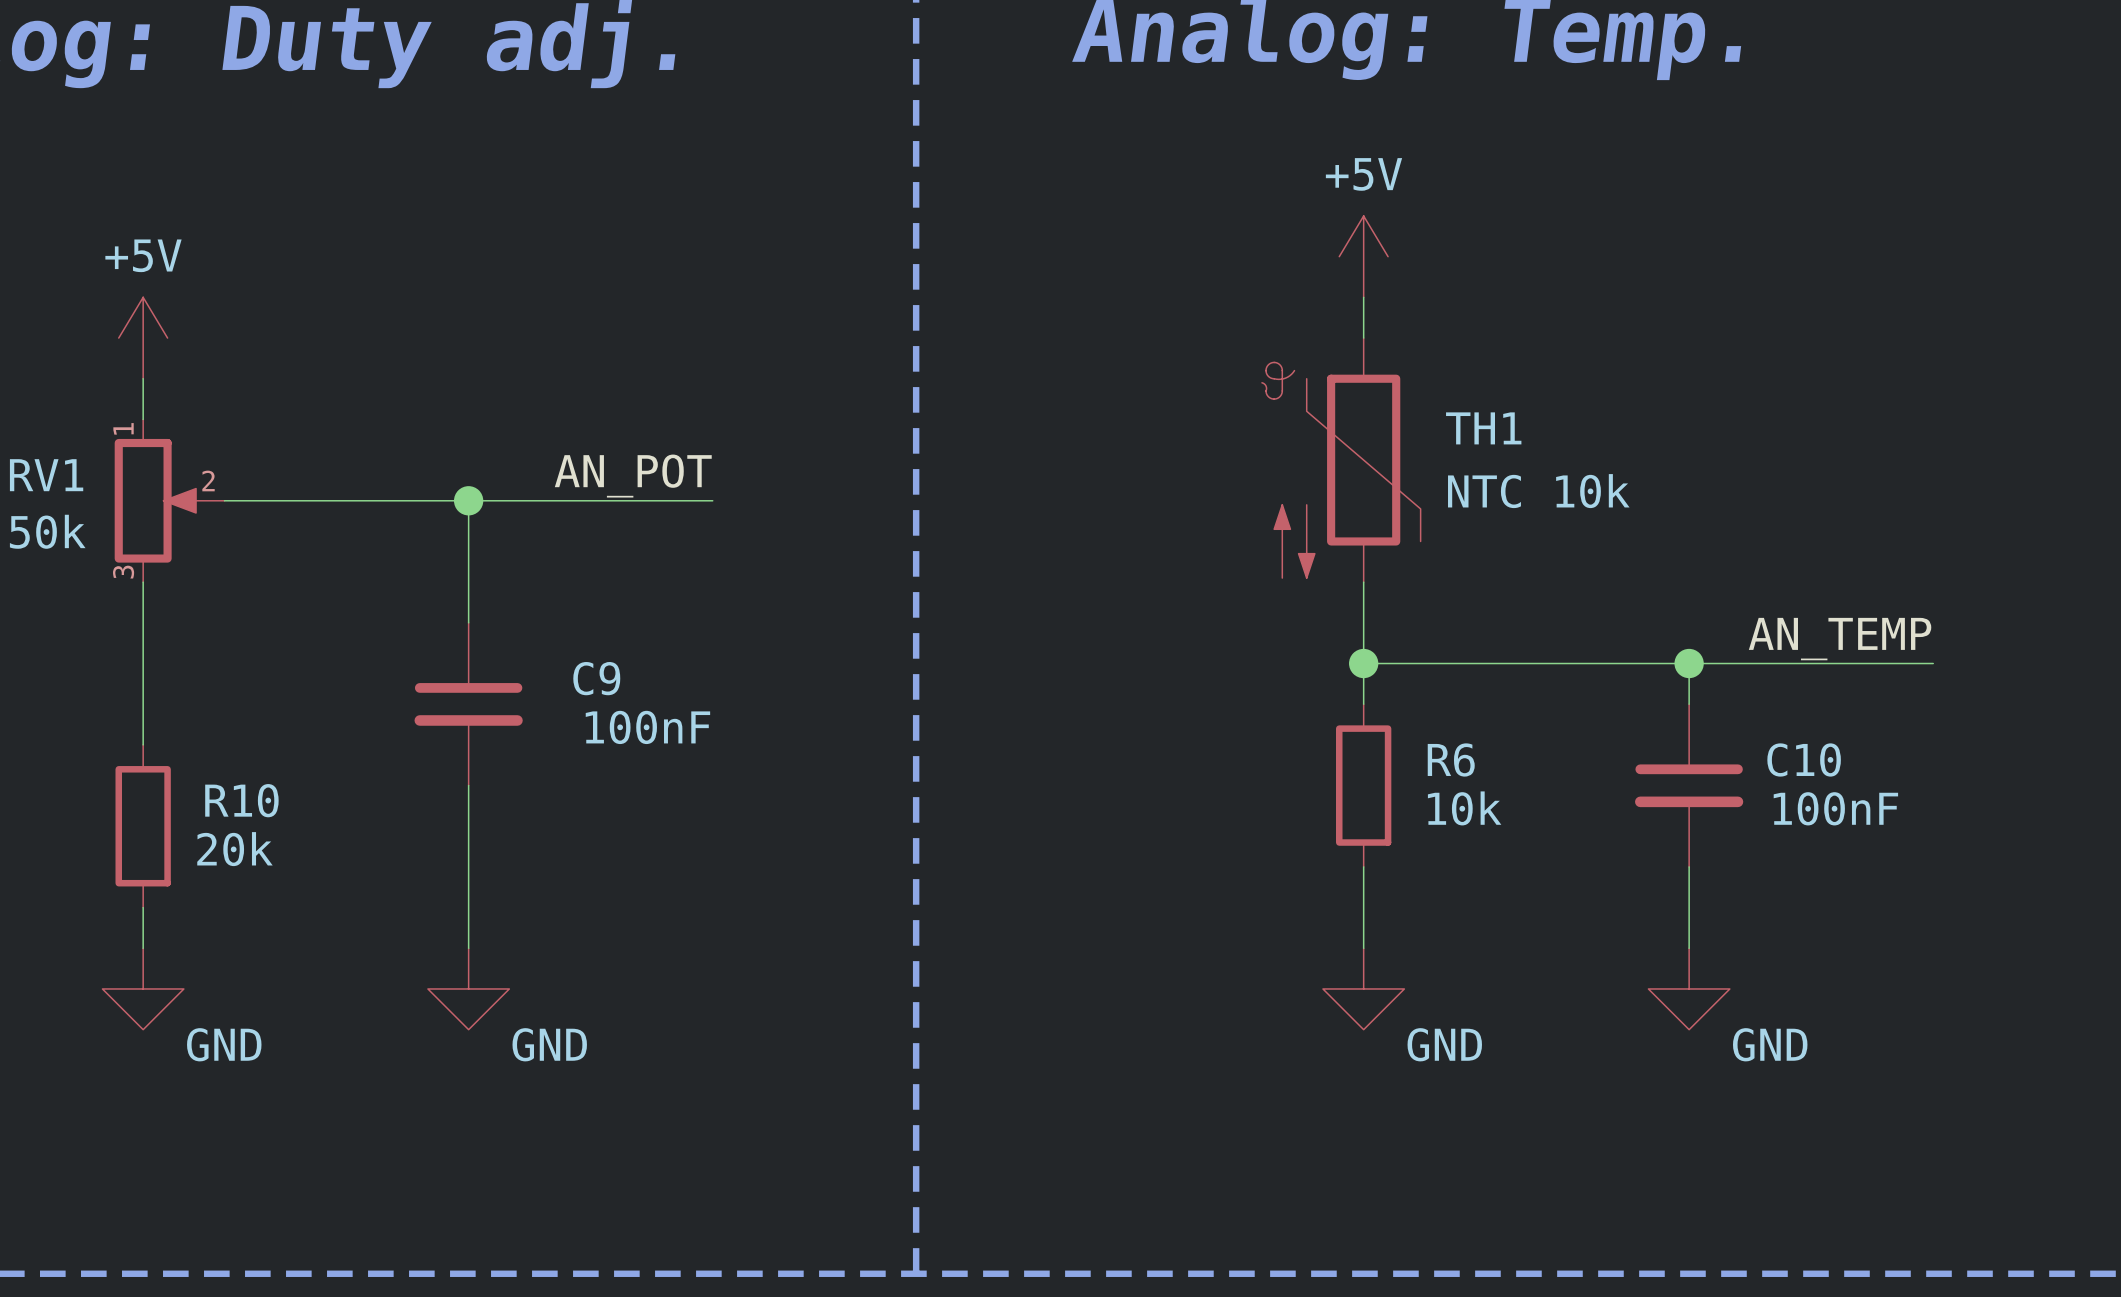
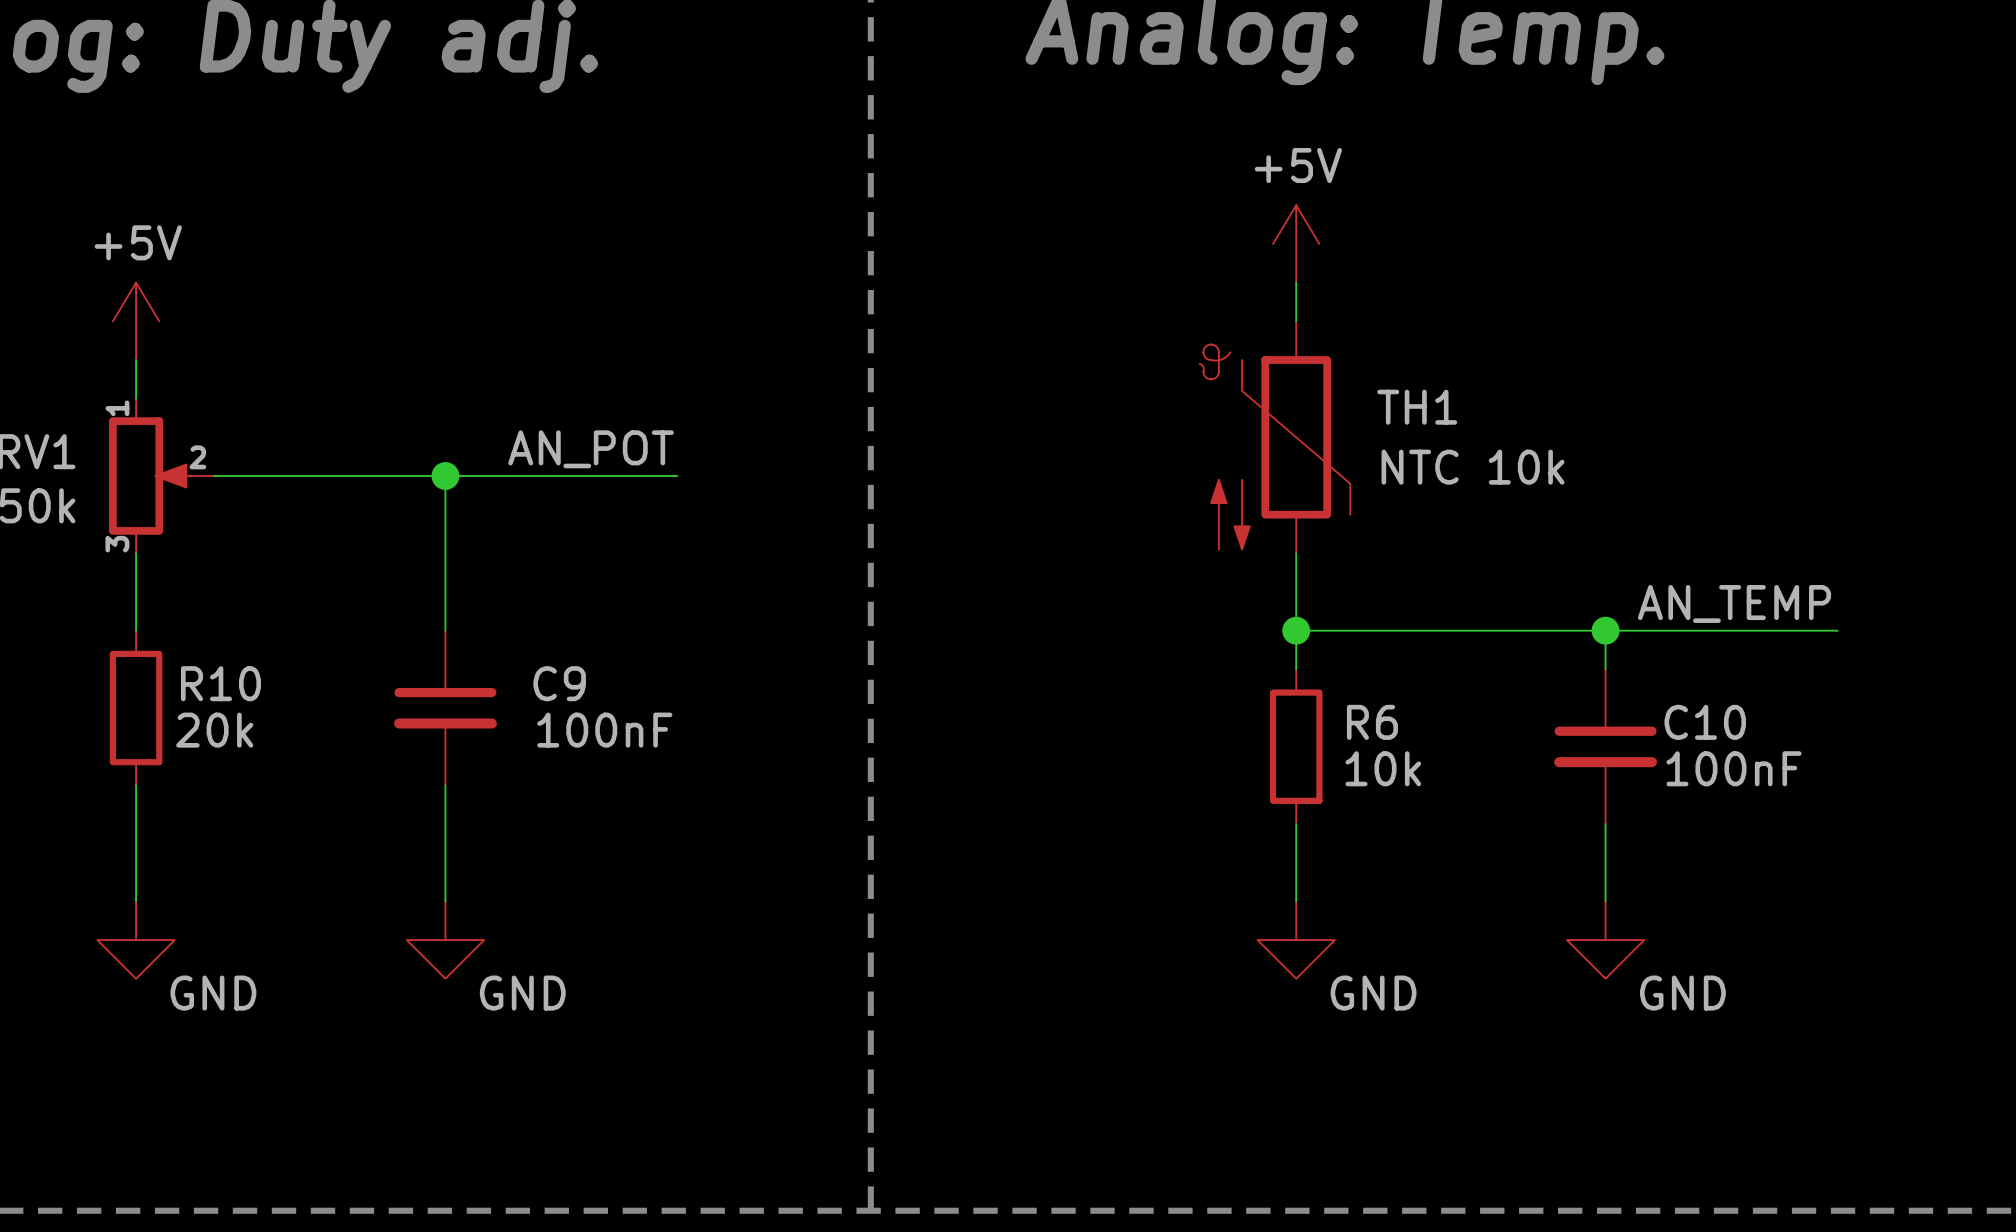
wire: (143, 663) (143, 744) -> (136, 785) (136, 862)
C9 position: (468, 704) -> (445, 708)
R10 position: (143, 826) -> (136, 708)

